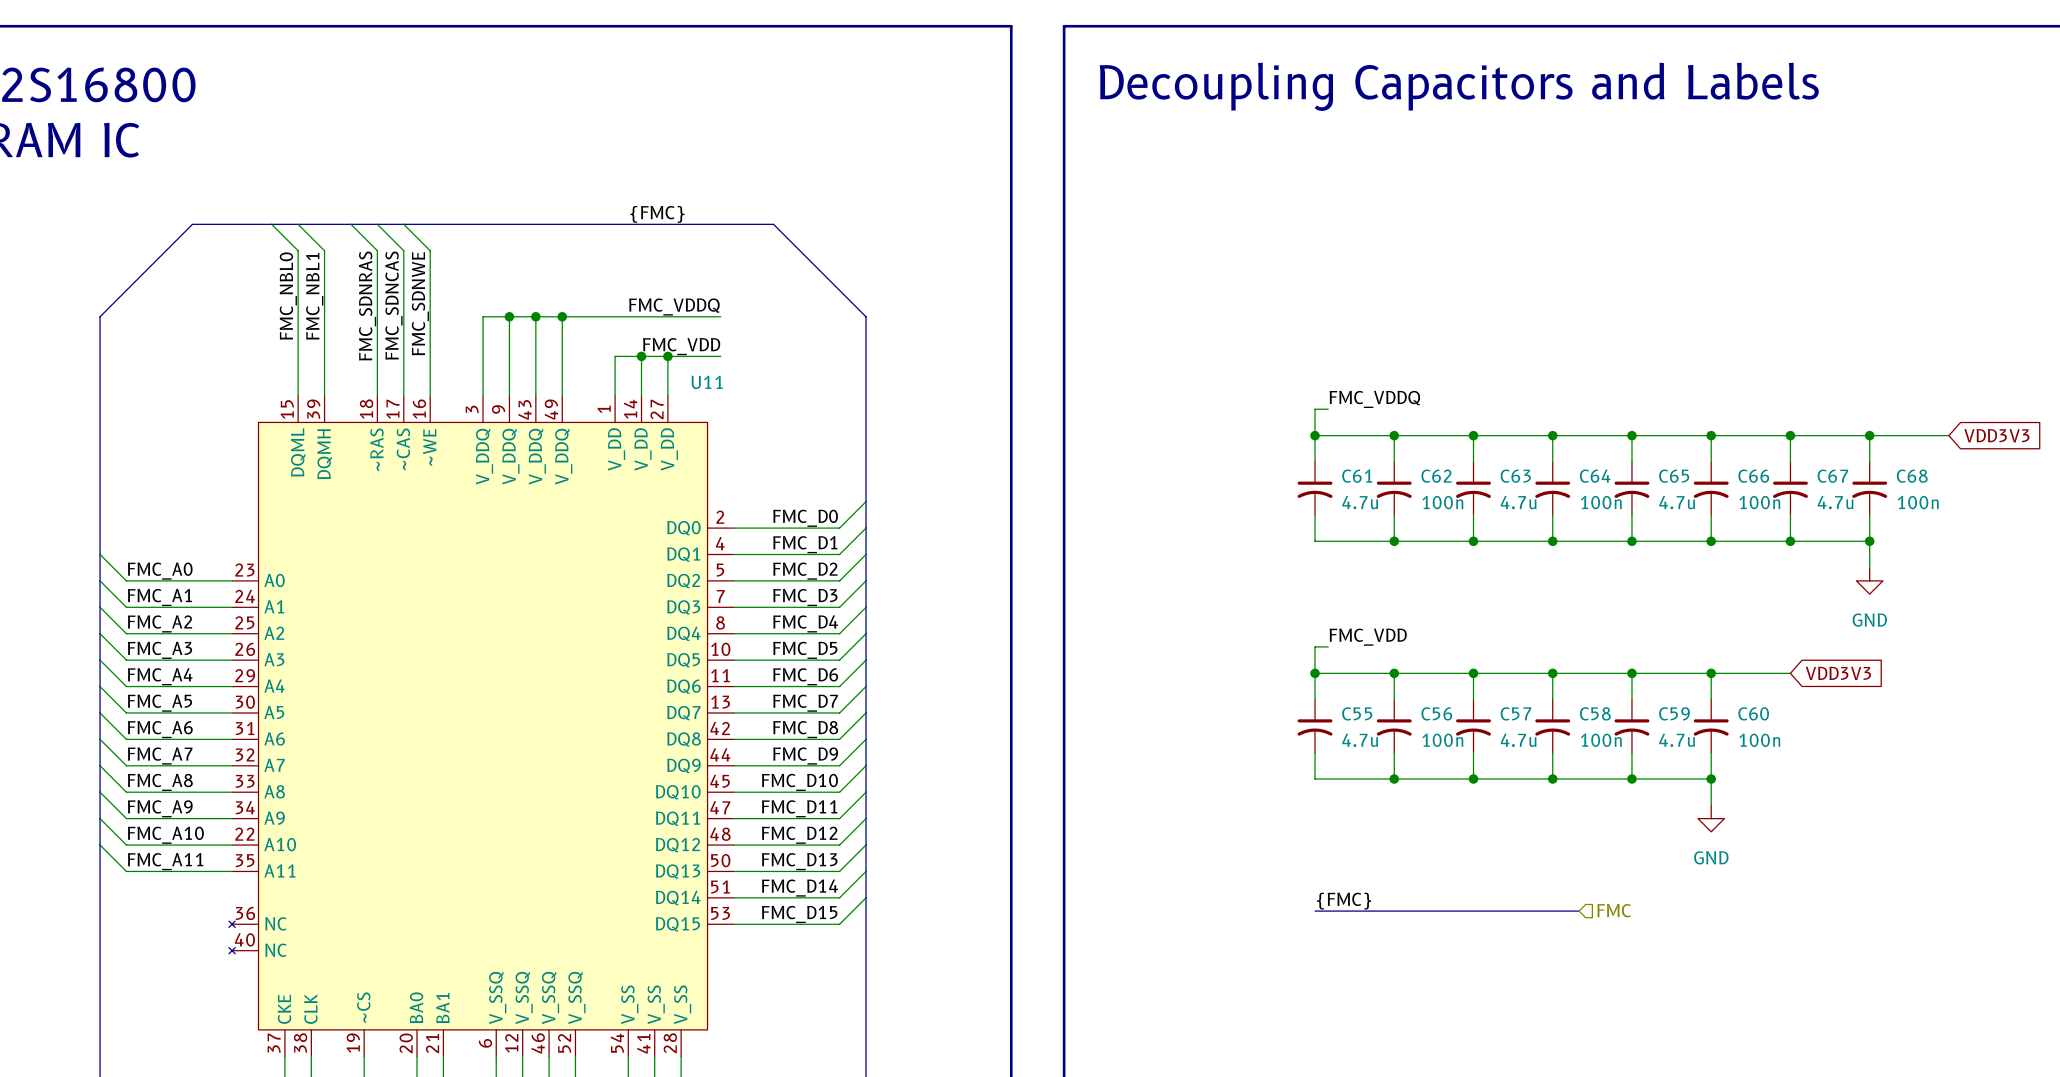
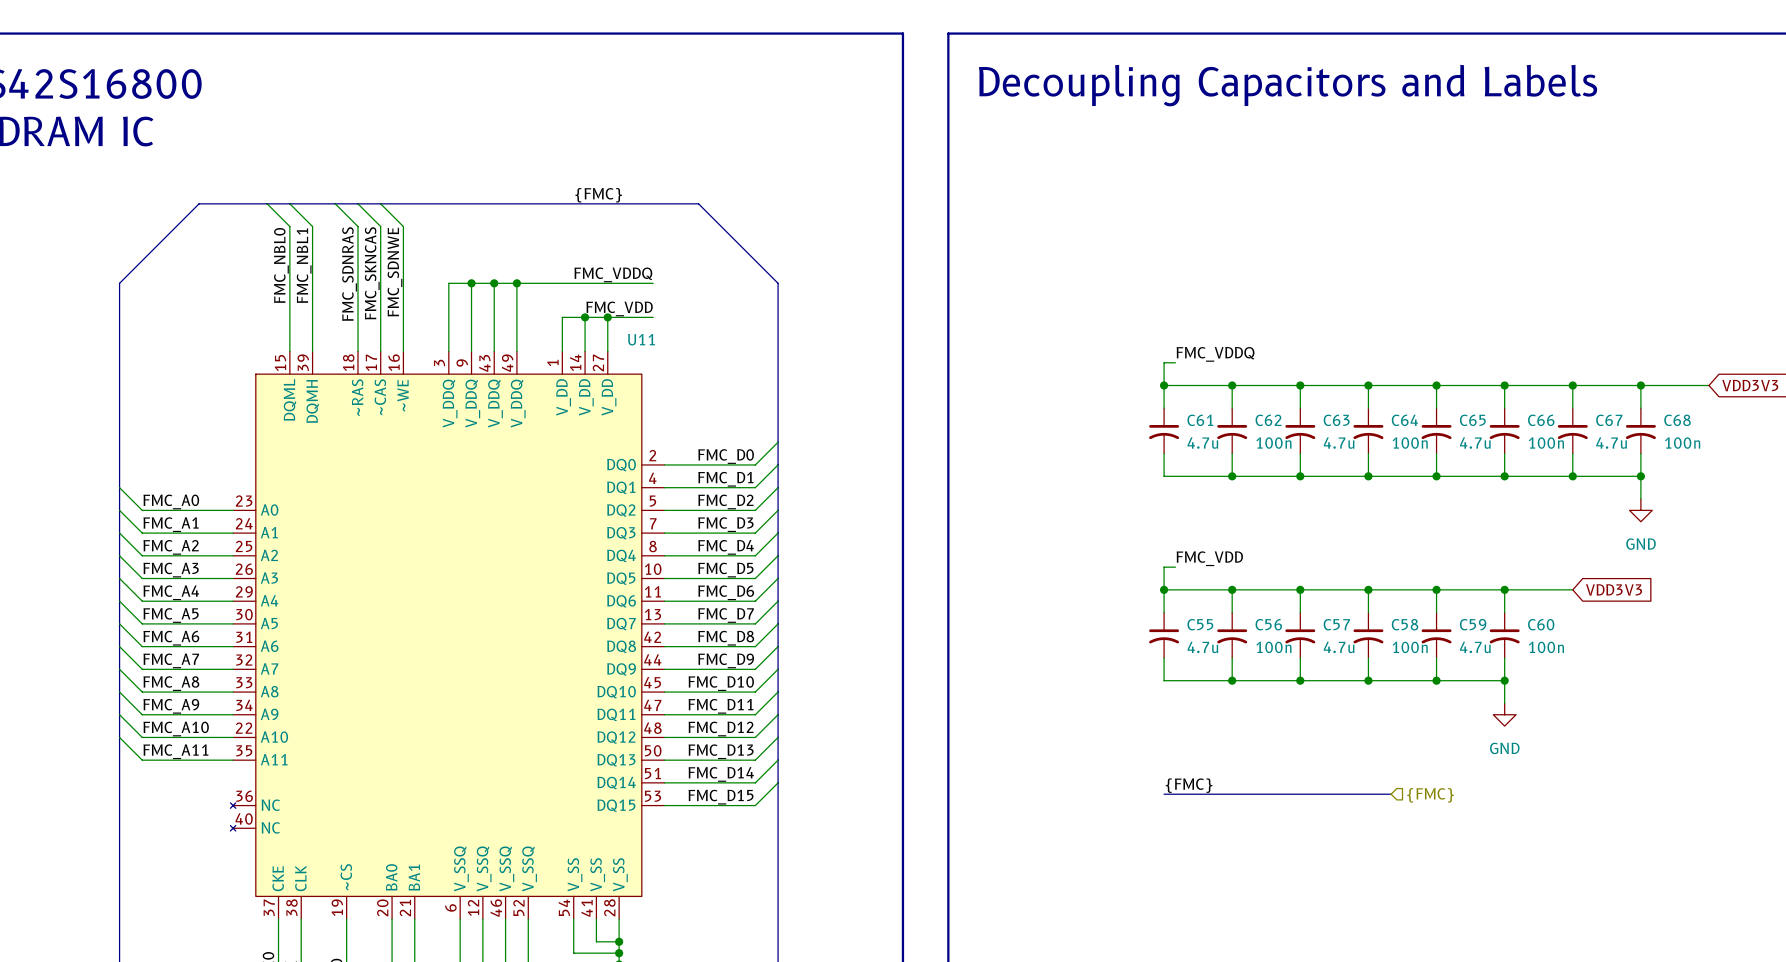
label: FMC_SDNCAS (393, 305) -> FMC_SKNCAS (372, 273)
hierarchical label: FMC (1614, 910) -> {FMC} (1430, 795)

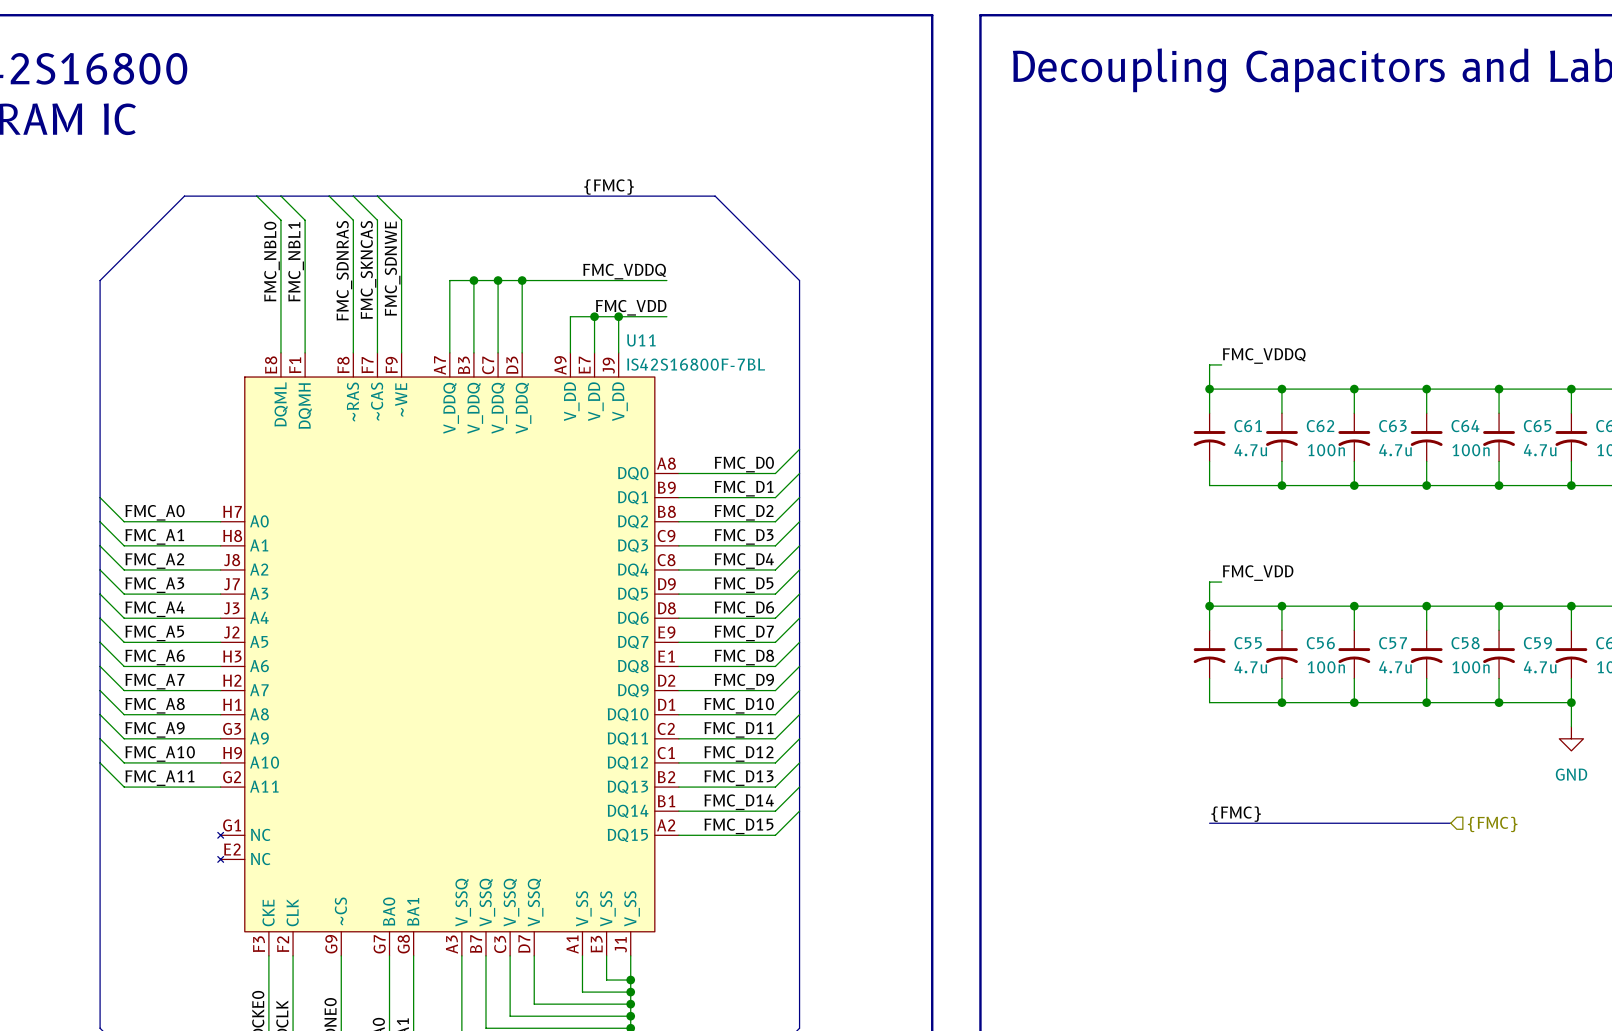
U11 symbol: [230, 351, 665, 920] -> [217, 352, 679, 956]
U11 value: none -> IS42S16800F-7BL (696, 364)

